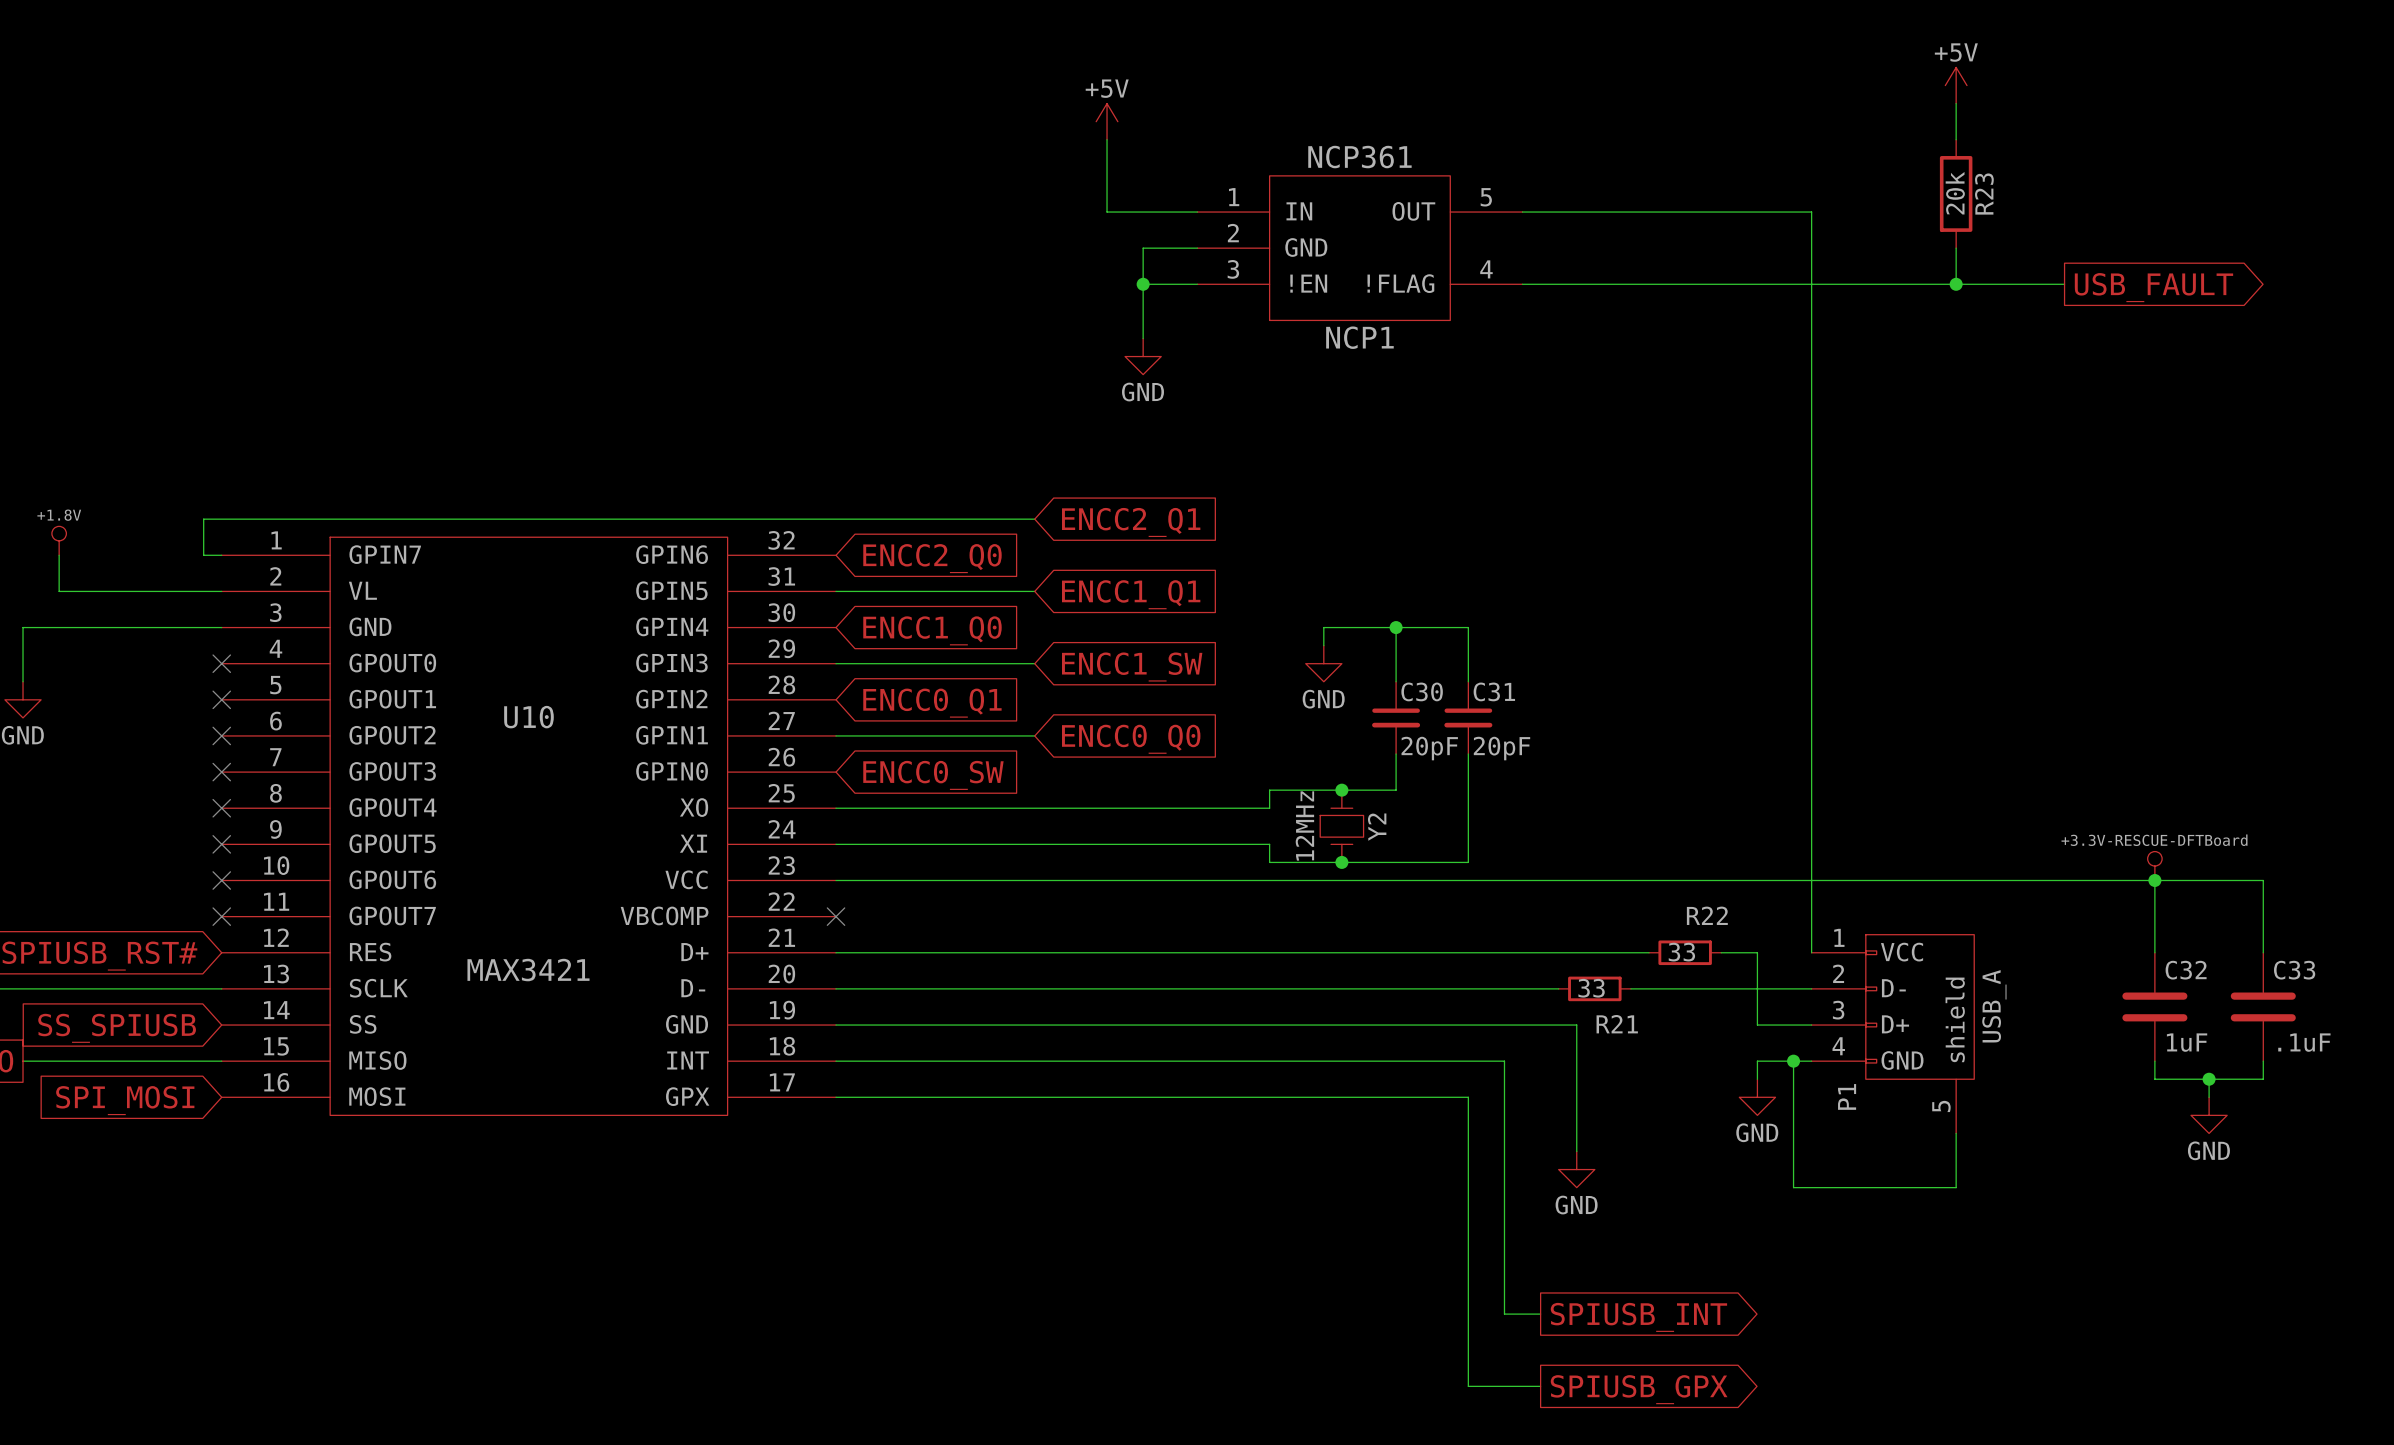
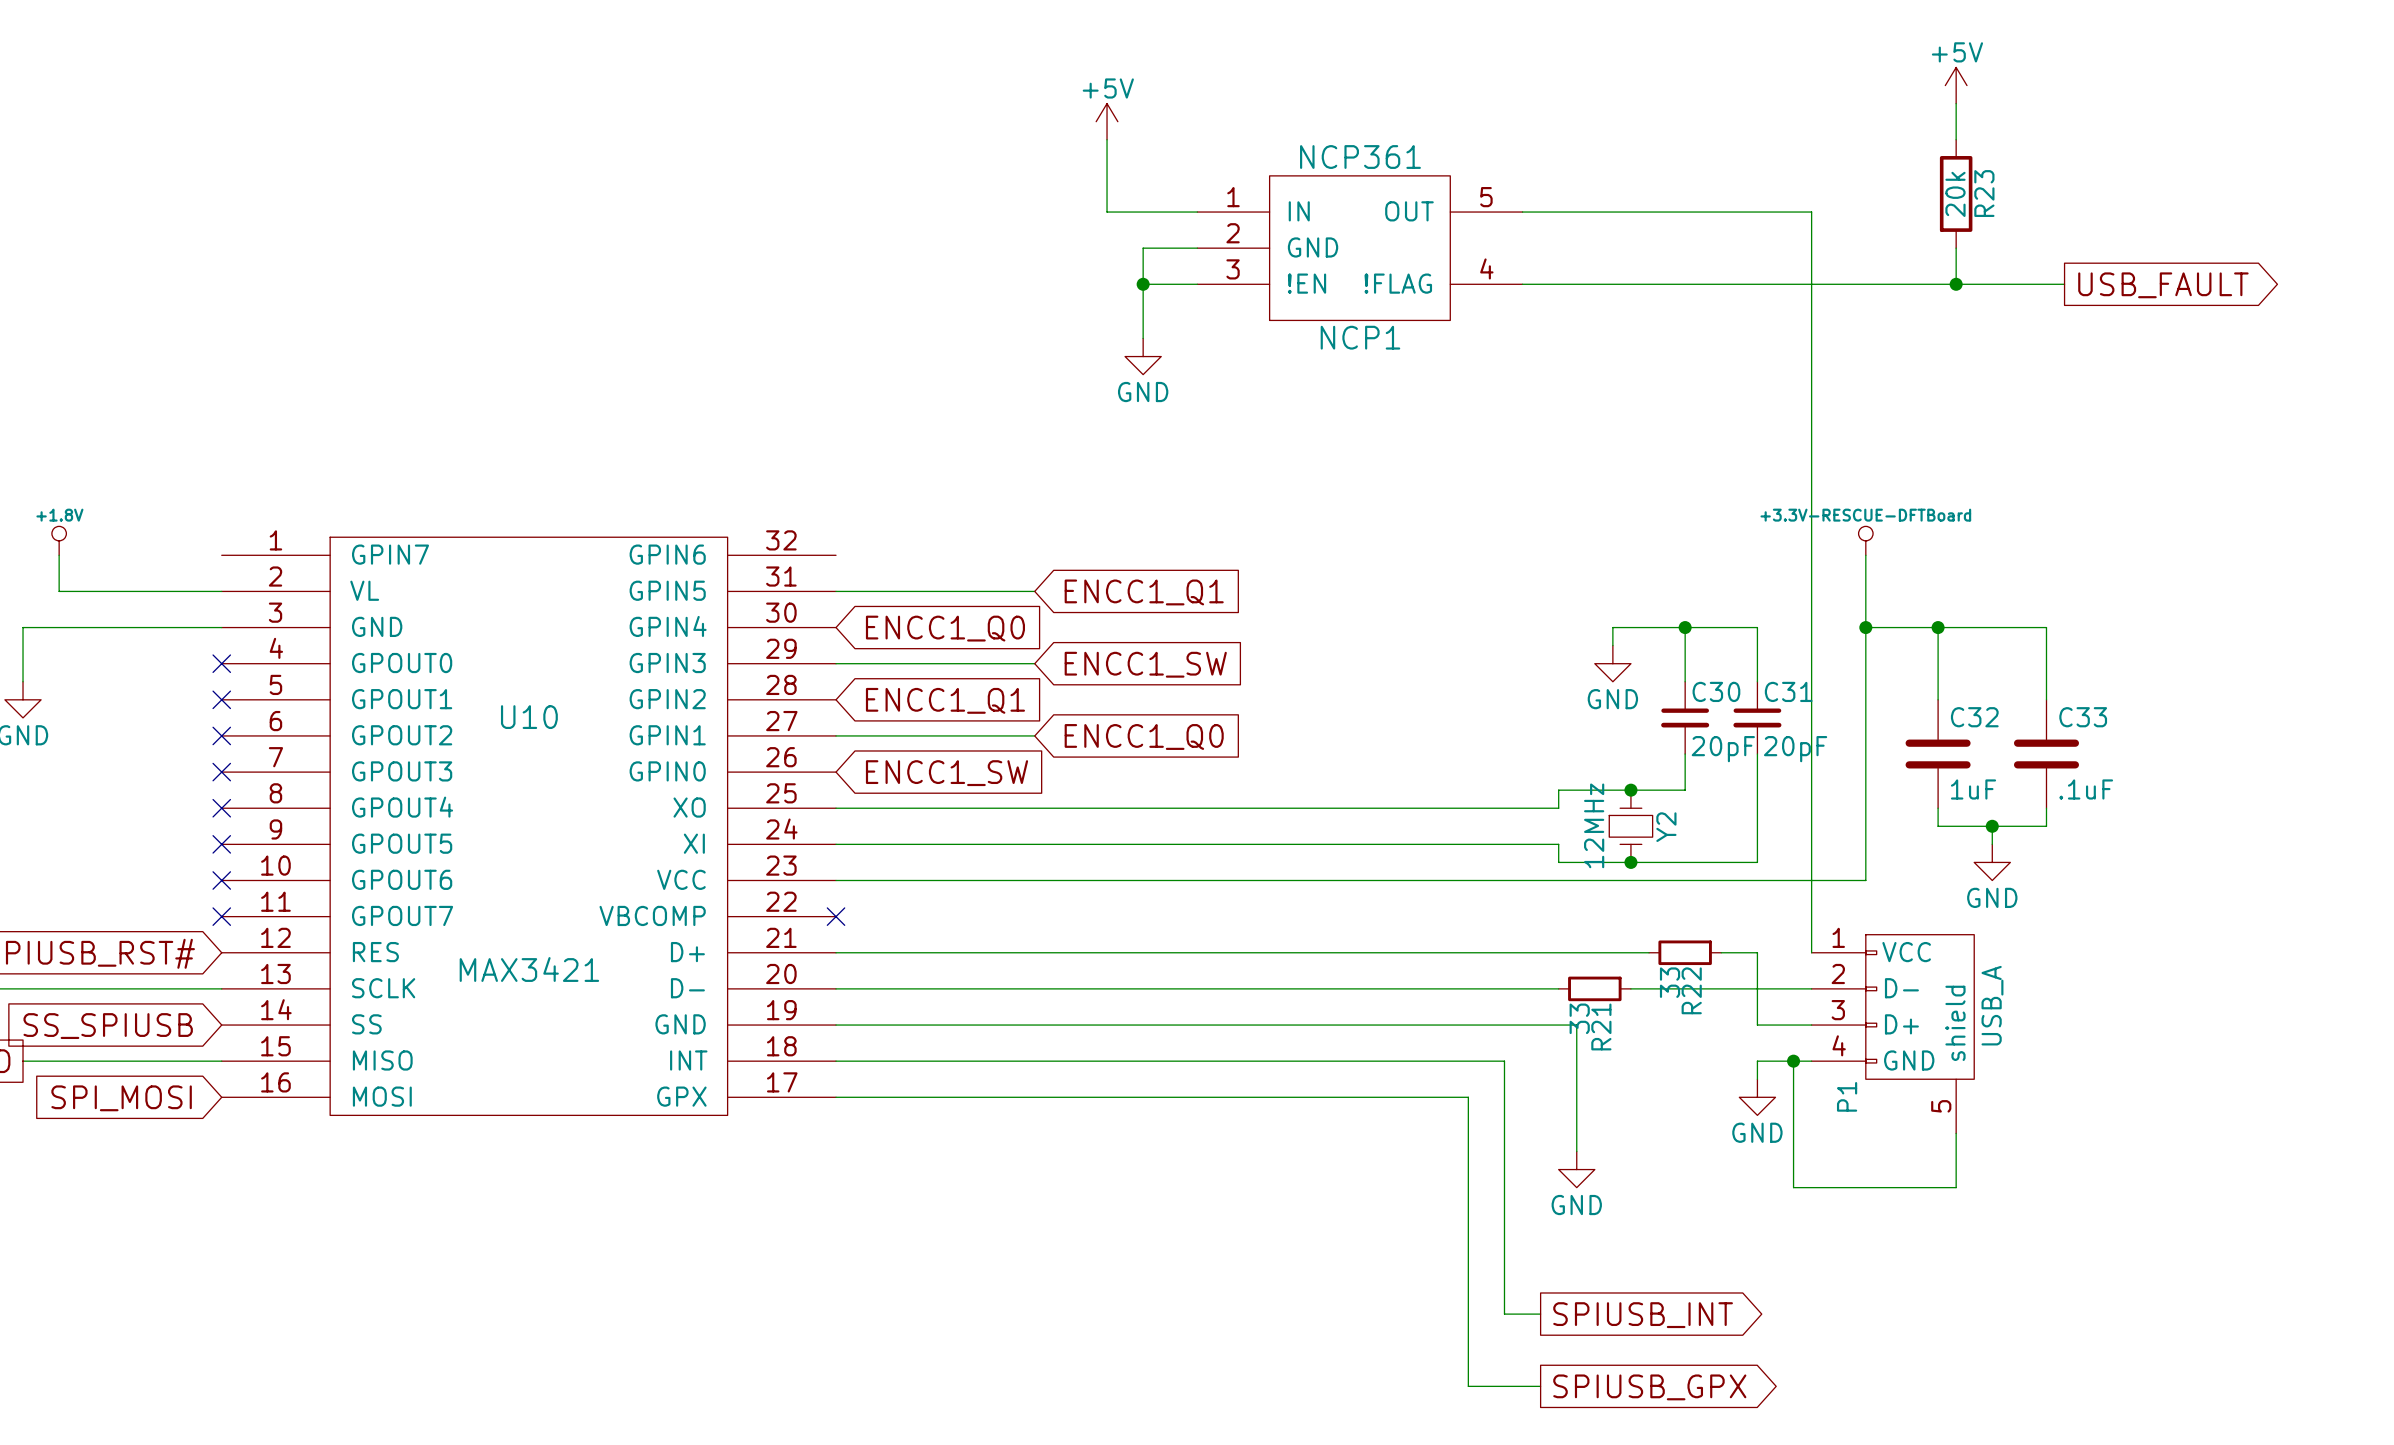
wire: (1034, 519) (203, 519) (203, 555) (221, 555) -> none
global label: ENCC2_Q1 (1131, 522) -> none
power symbol: none -> +3.3V-RESCUE-DFTBoard (1865, 540)
global label: ENCC2_Q0 (932, 558) -> none
wire: (1396, 627) (1396, 681) -> (1685, 627) (1685, 681)
junction: (1396, 627) -> none
junction: none -> (1685, 627)
wire: none -> (1865, 627) (2046, 627) (2046, 699)
junction: none -> (1865, 627)
junction: none -> (1938, 627)
wire: (1323, 645) (1323, 627) (1468, 627) (1468, 681) -> (1612, 645) (1612, 627) (1757, 627) (1757, 681)
power symbol position: GND (1323, 663) -> GND (1612, 663)
global label: ENCC0_Q1 (932, 703) -> ENCC1_Q1 (945, 700)
C30 position: (1396, 717) -> (1685, 717)
C31 position: (1468, 717) -> (1757, 717)
global label: ENCC0_Q0 (1131, 739) -> ENCC1_Q0 (1144, 736)
wire: (1396, 754) (1396, 790) (1269, 790) (1269, 808) -> (1685, 754) (1685, 790) (1558, 790) (1558, 808) (1269, 808)
wire: (1468, 754) (1468, 862) (1269, 862) (1269, 844) -> (1757, 754) (1757, 862) (1558, 862) (1558, 844) (1269, 844)
global label: ENCC0_SW (933, 775) -> ENCC1_SW (947, 773)
junction: (1341, 790) -> none
junction: none -> (1630, 790)
Y2 position: (1341, 826) -> (1630, 826)
junction: none -> (1992, 826)
junction: (1341, 862) -> none
junction: none -> (1630, 862)
power symbol: +3.3V-RESCUE-DFTBoard (2154, 866) -> none
wire: (1865, 880) (2263, 880) (2263, 952) -> (1865, 880) (1865, 555)
wire: (2154, 880) (2154, 952) -> (1938, 627) (1938, 699)
junction: (2154, 880) -> none
R22 name rotation: 0° (1707, 915) -> 90° counterclockwise (1691, 990)
R22 name position: R22 (1707, 915) -> R22 (1691, 990)
R22 value rotation: 0° (1681, 952) -> 90° counterclockwise (1670, 982)
R21 value rotation: 0° (1591, 988) -> 90° counterclockwise (1579, 1018)
C32 position: (2154, 1006) -> (1938, 754)
C33 position: (2263, 1006) -> (2046, 754)
R21 name rotation: 0° (1617, 1024) -> 90° counterclockwise (1601, 1026)
wire: (2154, 1061) (2154, 1079) (2263, 1079) (2263, 1061) -> (1938, 808) (1938, 826) (2046, 826) (2046, 808)
wire: (2209, 1079) (2209, 1097) -> (1992, 826) (1992, 844)
junction: (2209, 1079) -> none
power symbol position: GND (2209, 1115) -> GND (1992, 862)

